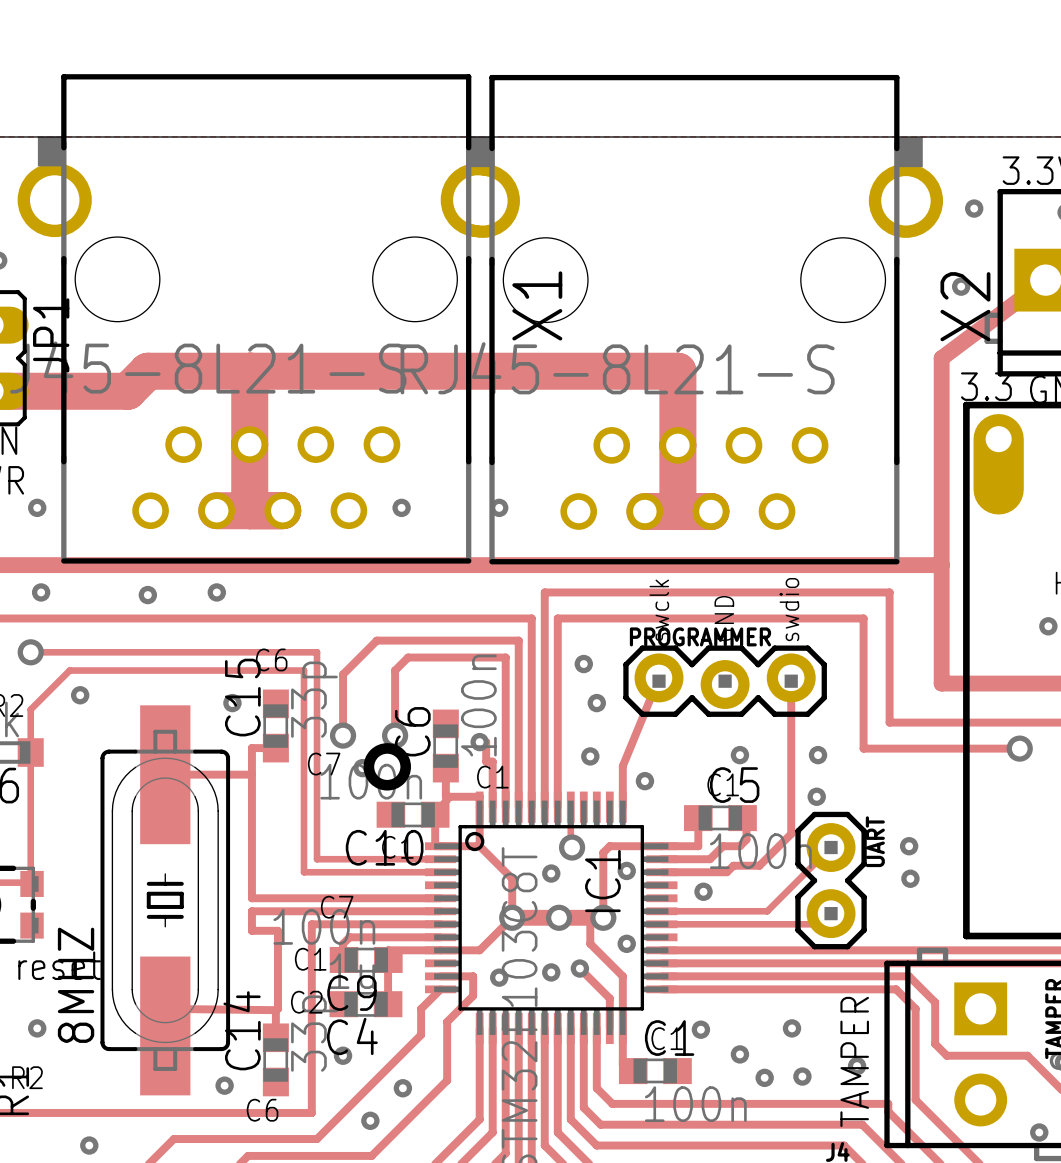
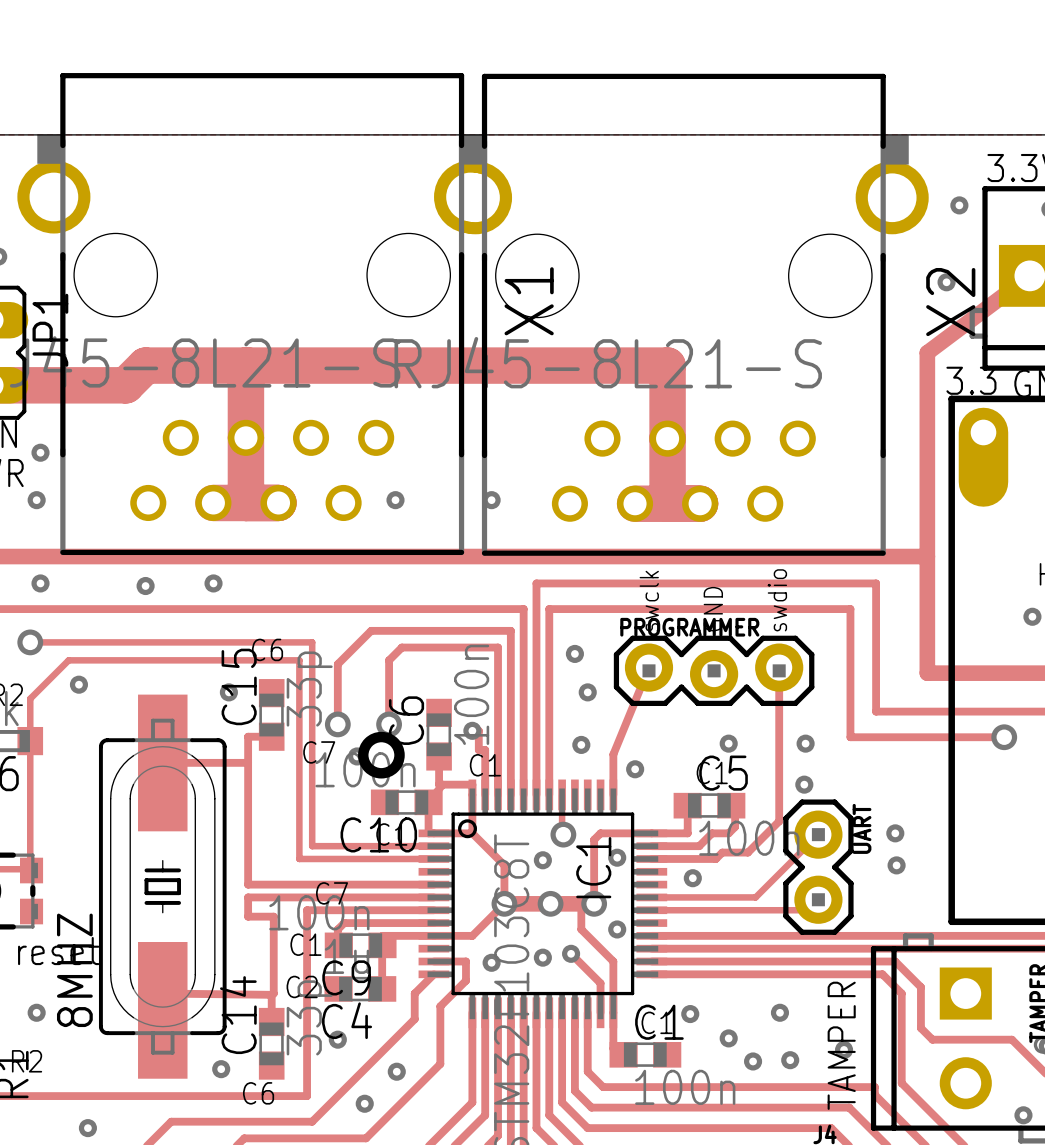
via: none -> (40, 452)

